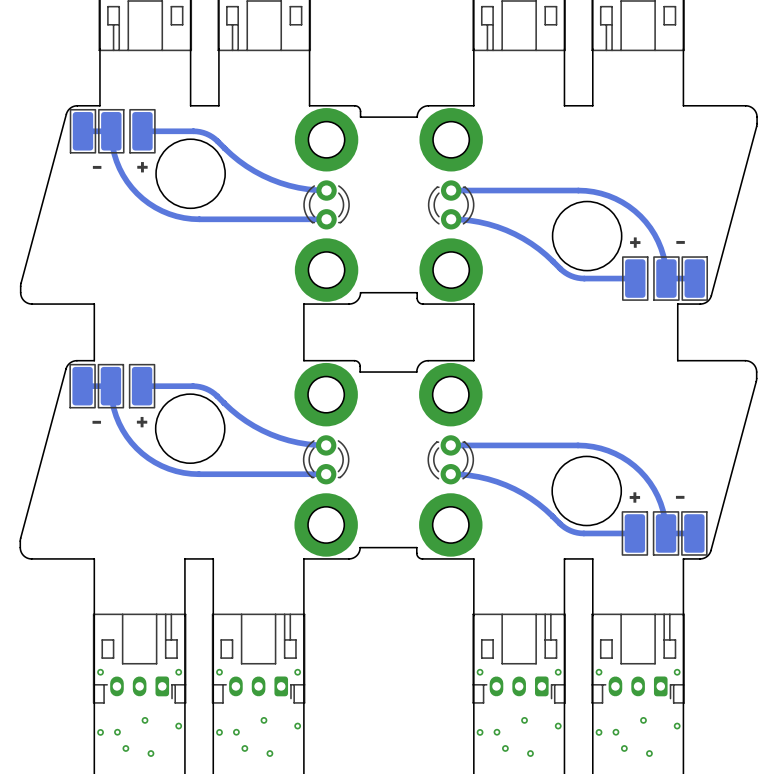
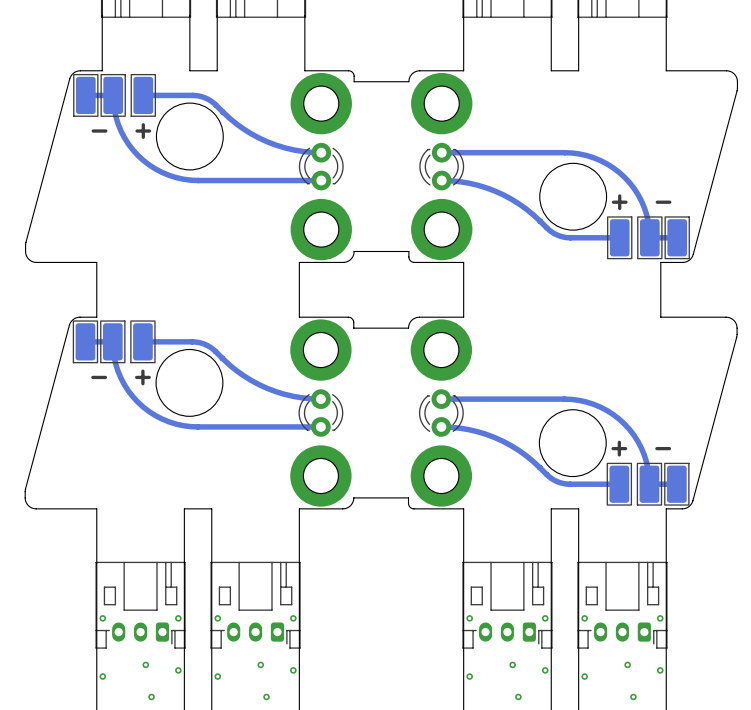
via: (117, 732) -> none
via: (236, 732) -> none
via: (496, 732) -> none
via: (615, 732) -> none
via: (125, 748) -> none
via: (244, 748) -> none
via: (505, 748) -> none
via: (624, 748) -> none

